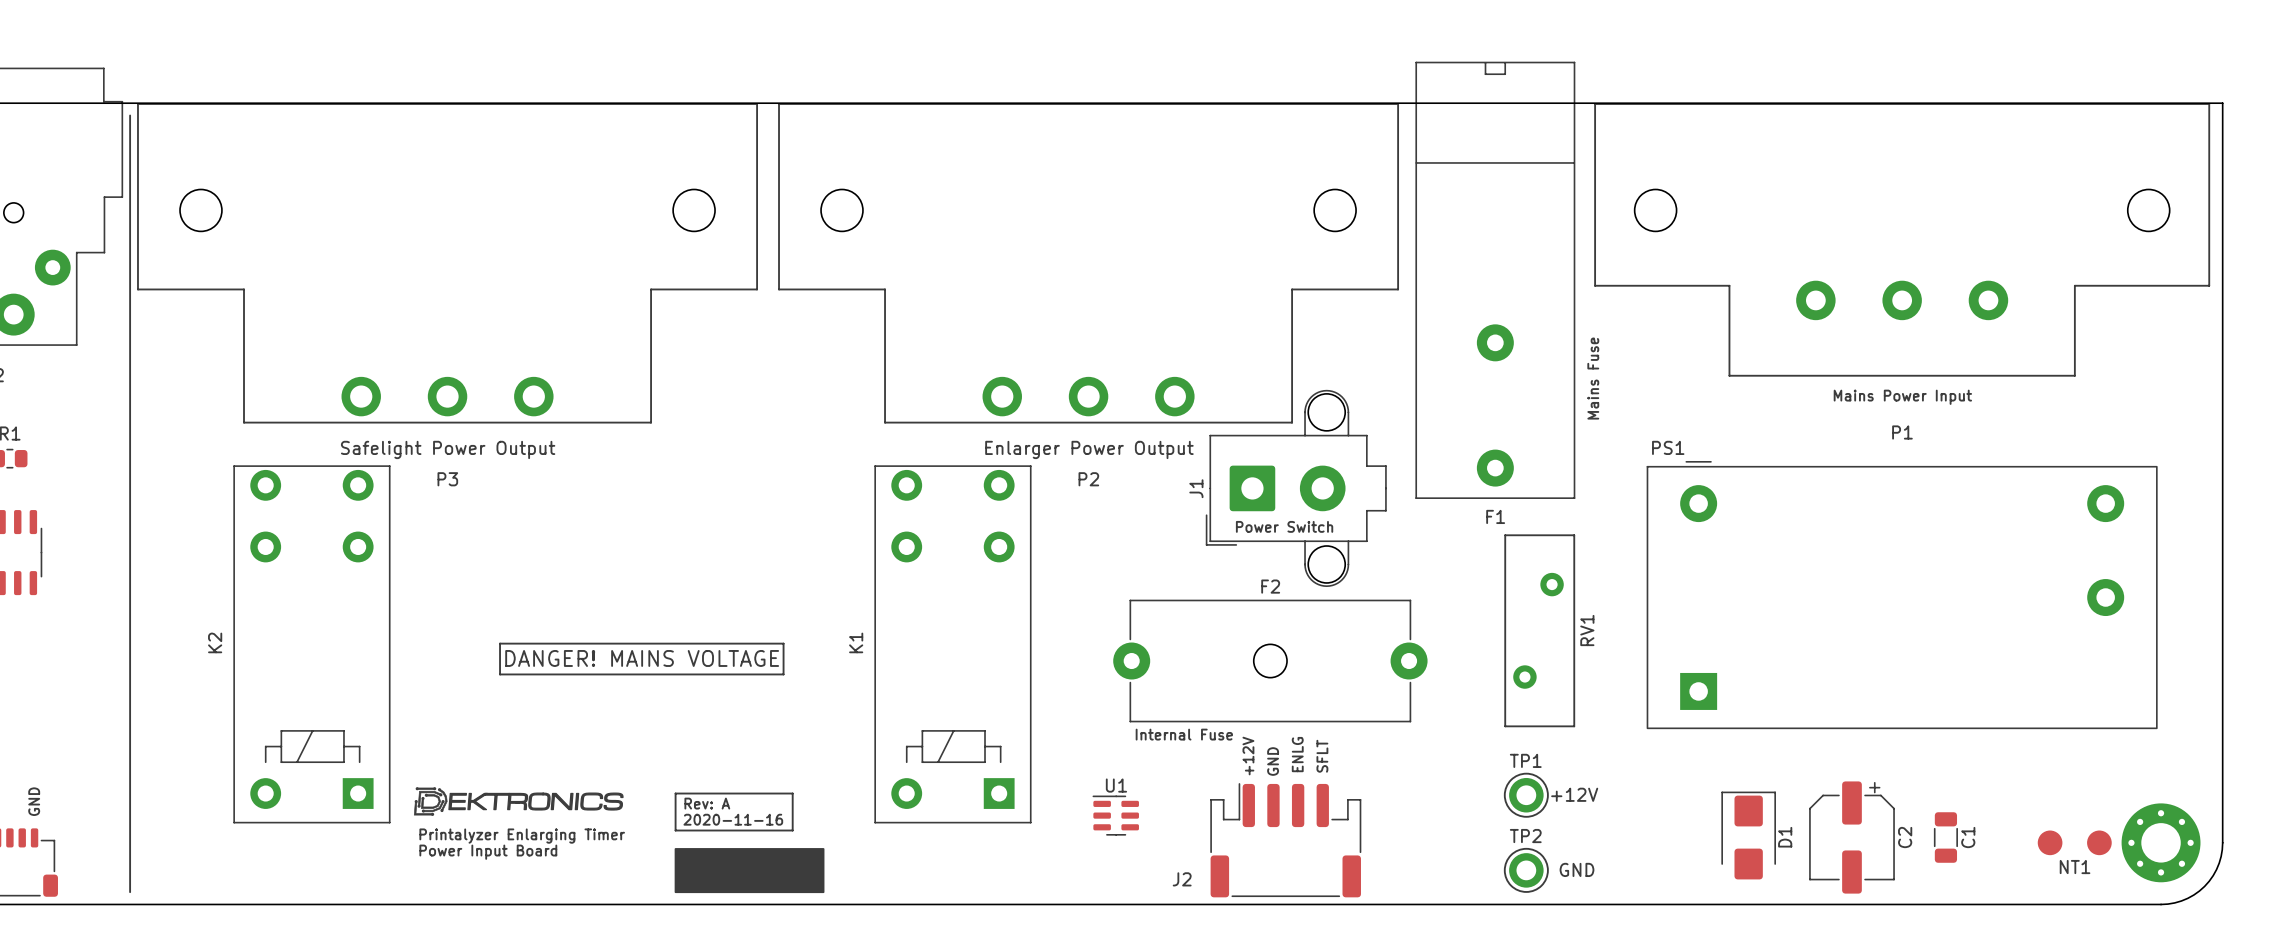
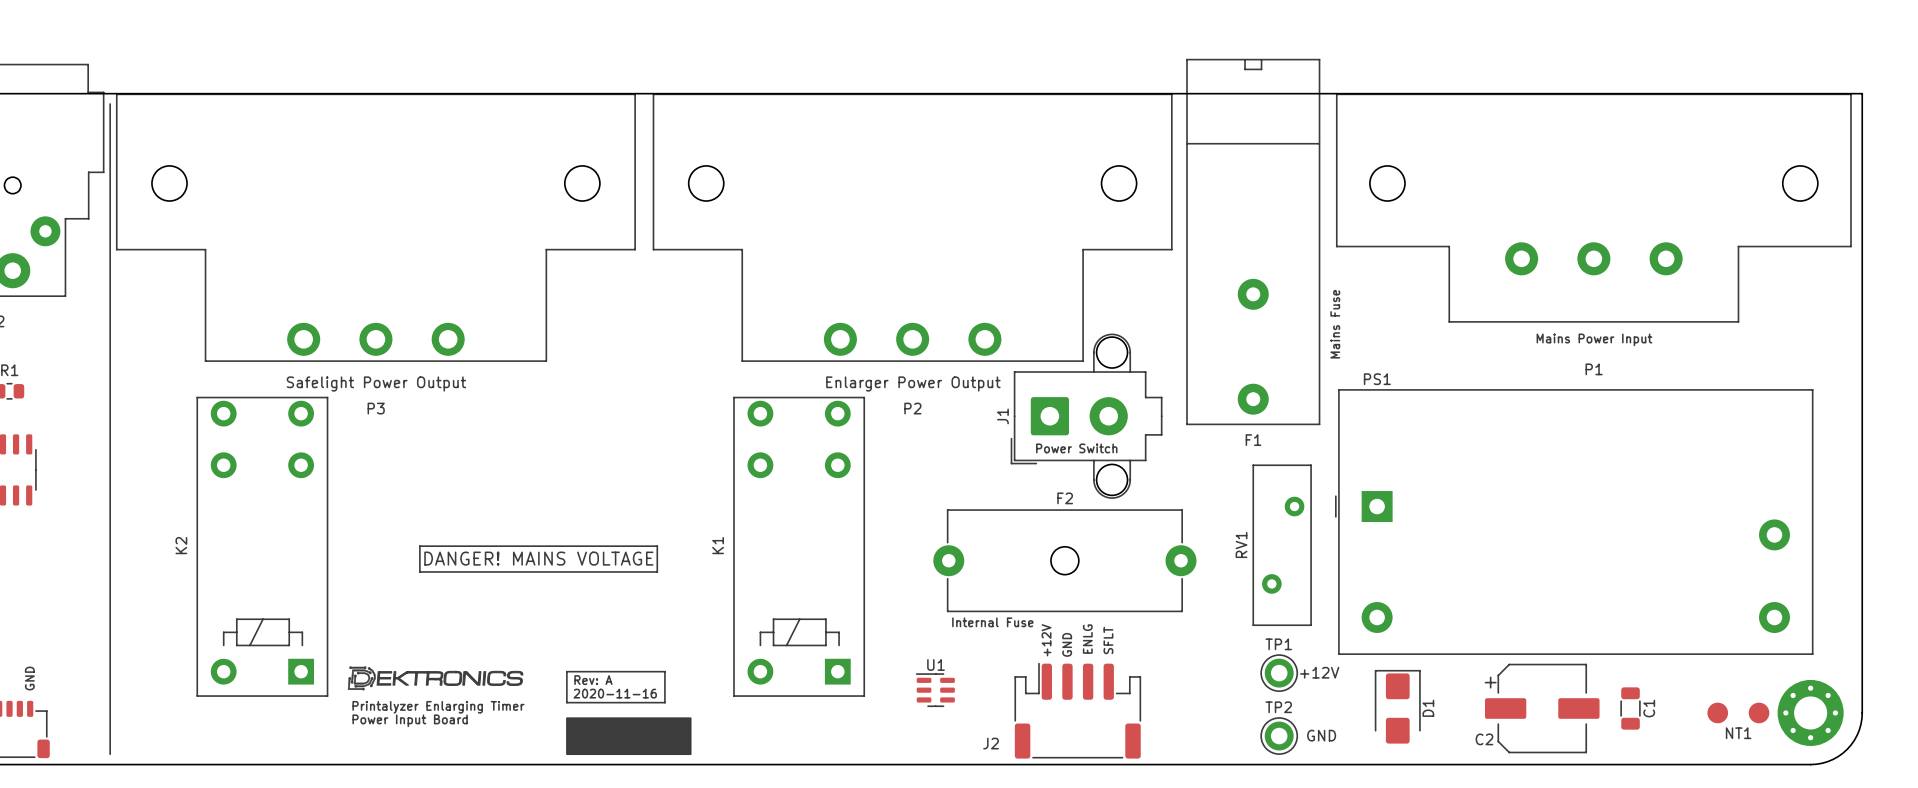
PS1 footprint: [1646, 461, 2158, 730] -> [1335, 389, 1814, 655]
RV1 rotation: 0° (1539, 630) -> 180° (1282, 545)
C2 footprint: [1809, 781, 1895, 894] -> [1484, 663, 1600, 754]
D1 position: (1748, 835) -> (1397, 706)
C2 name position: C2 (1905, 837) -> C2 (1484, 739)

